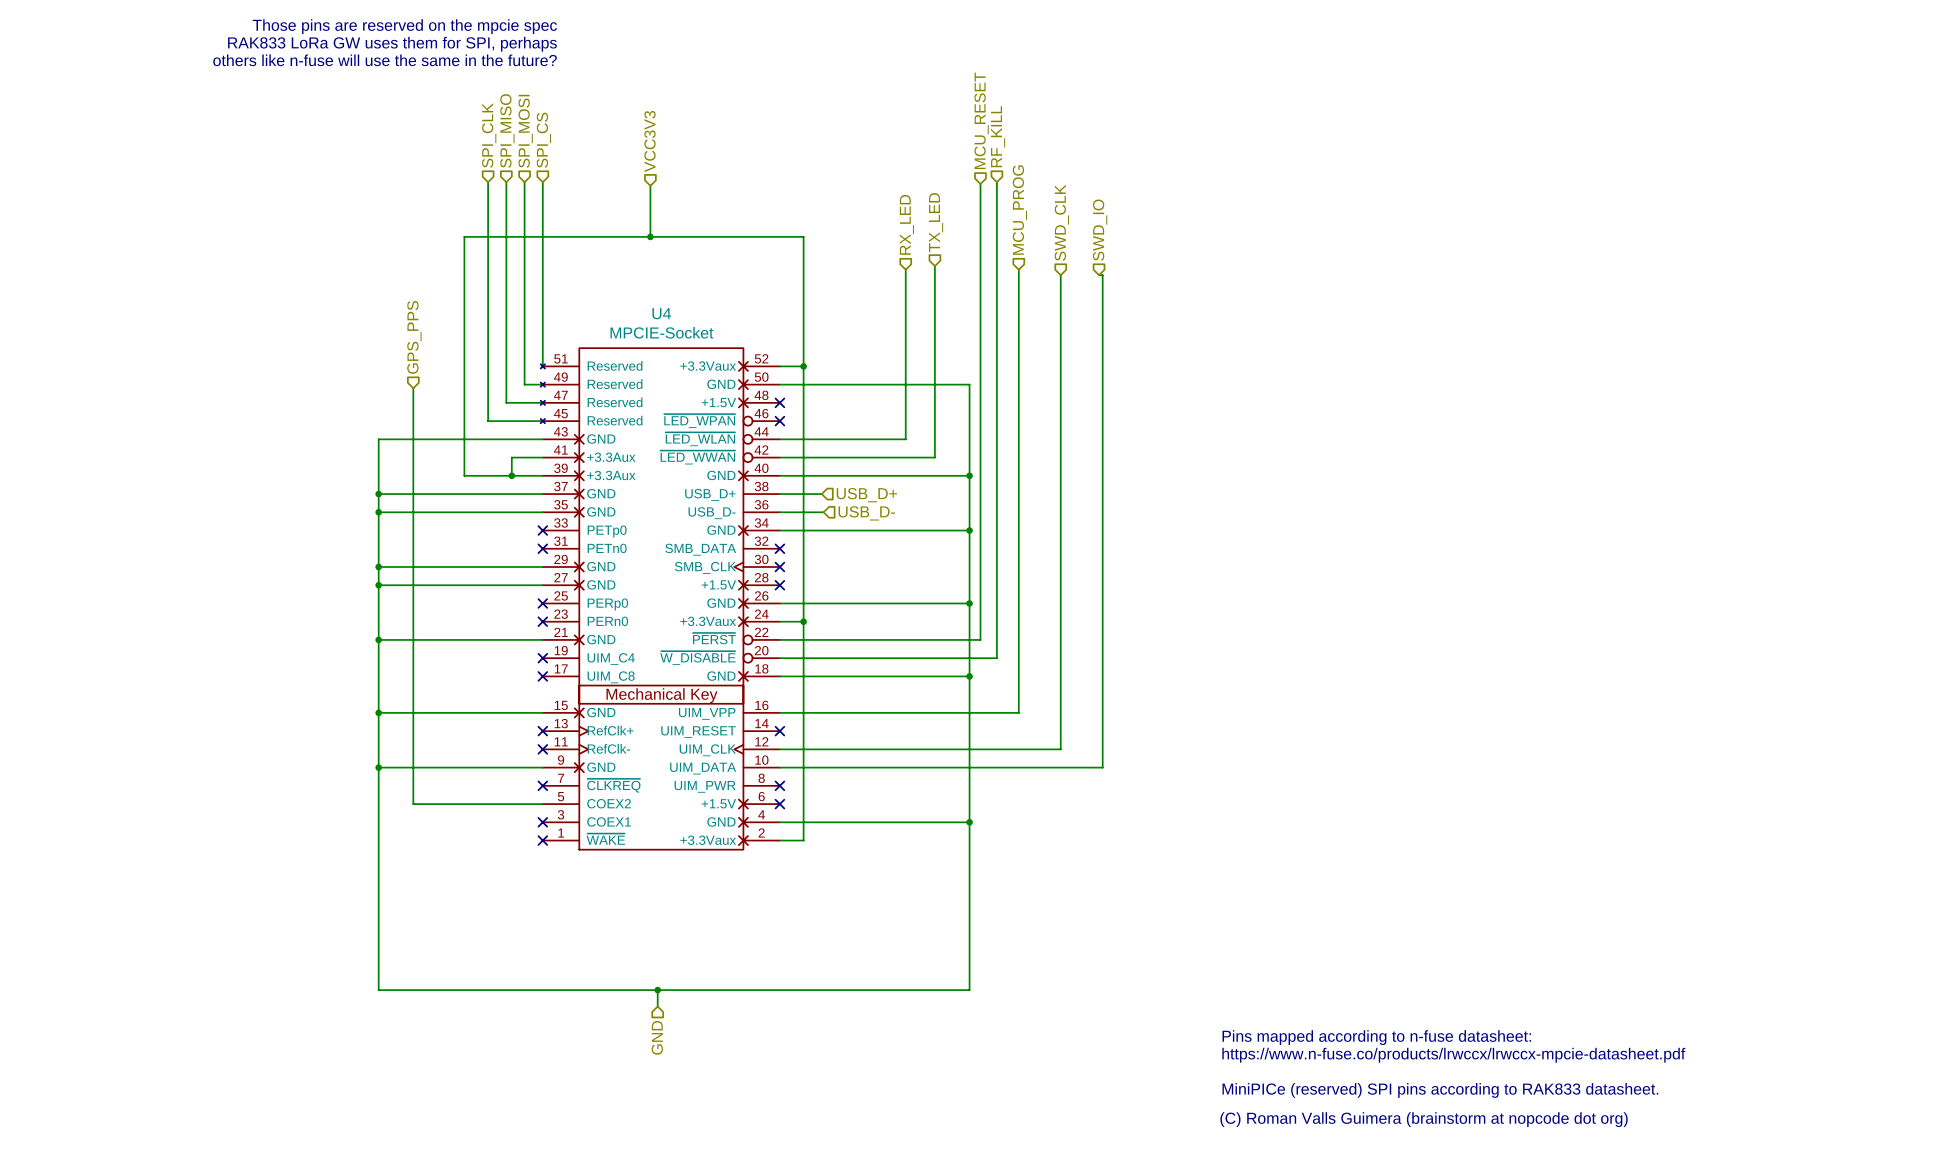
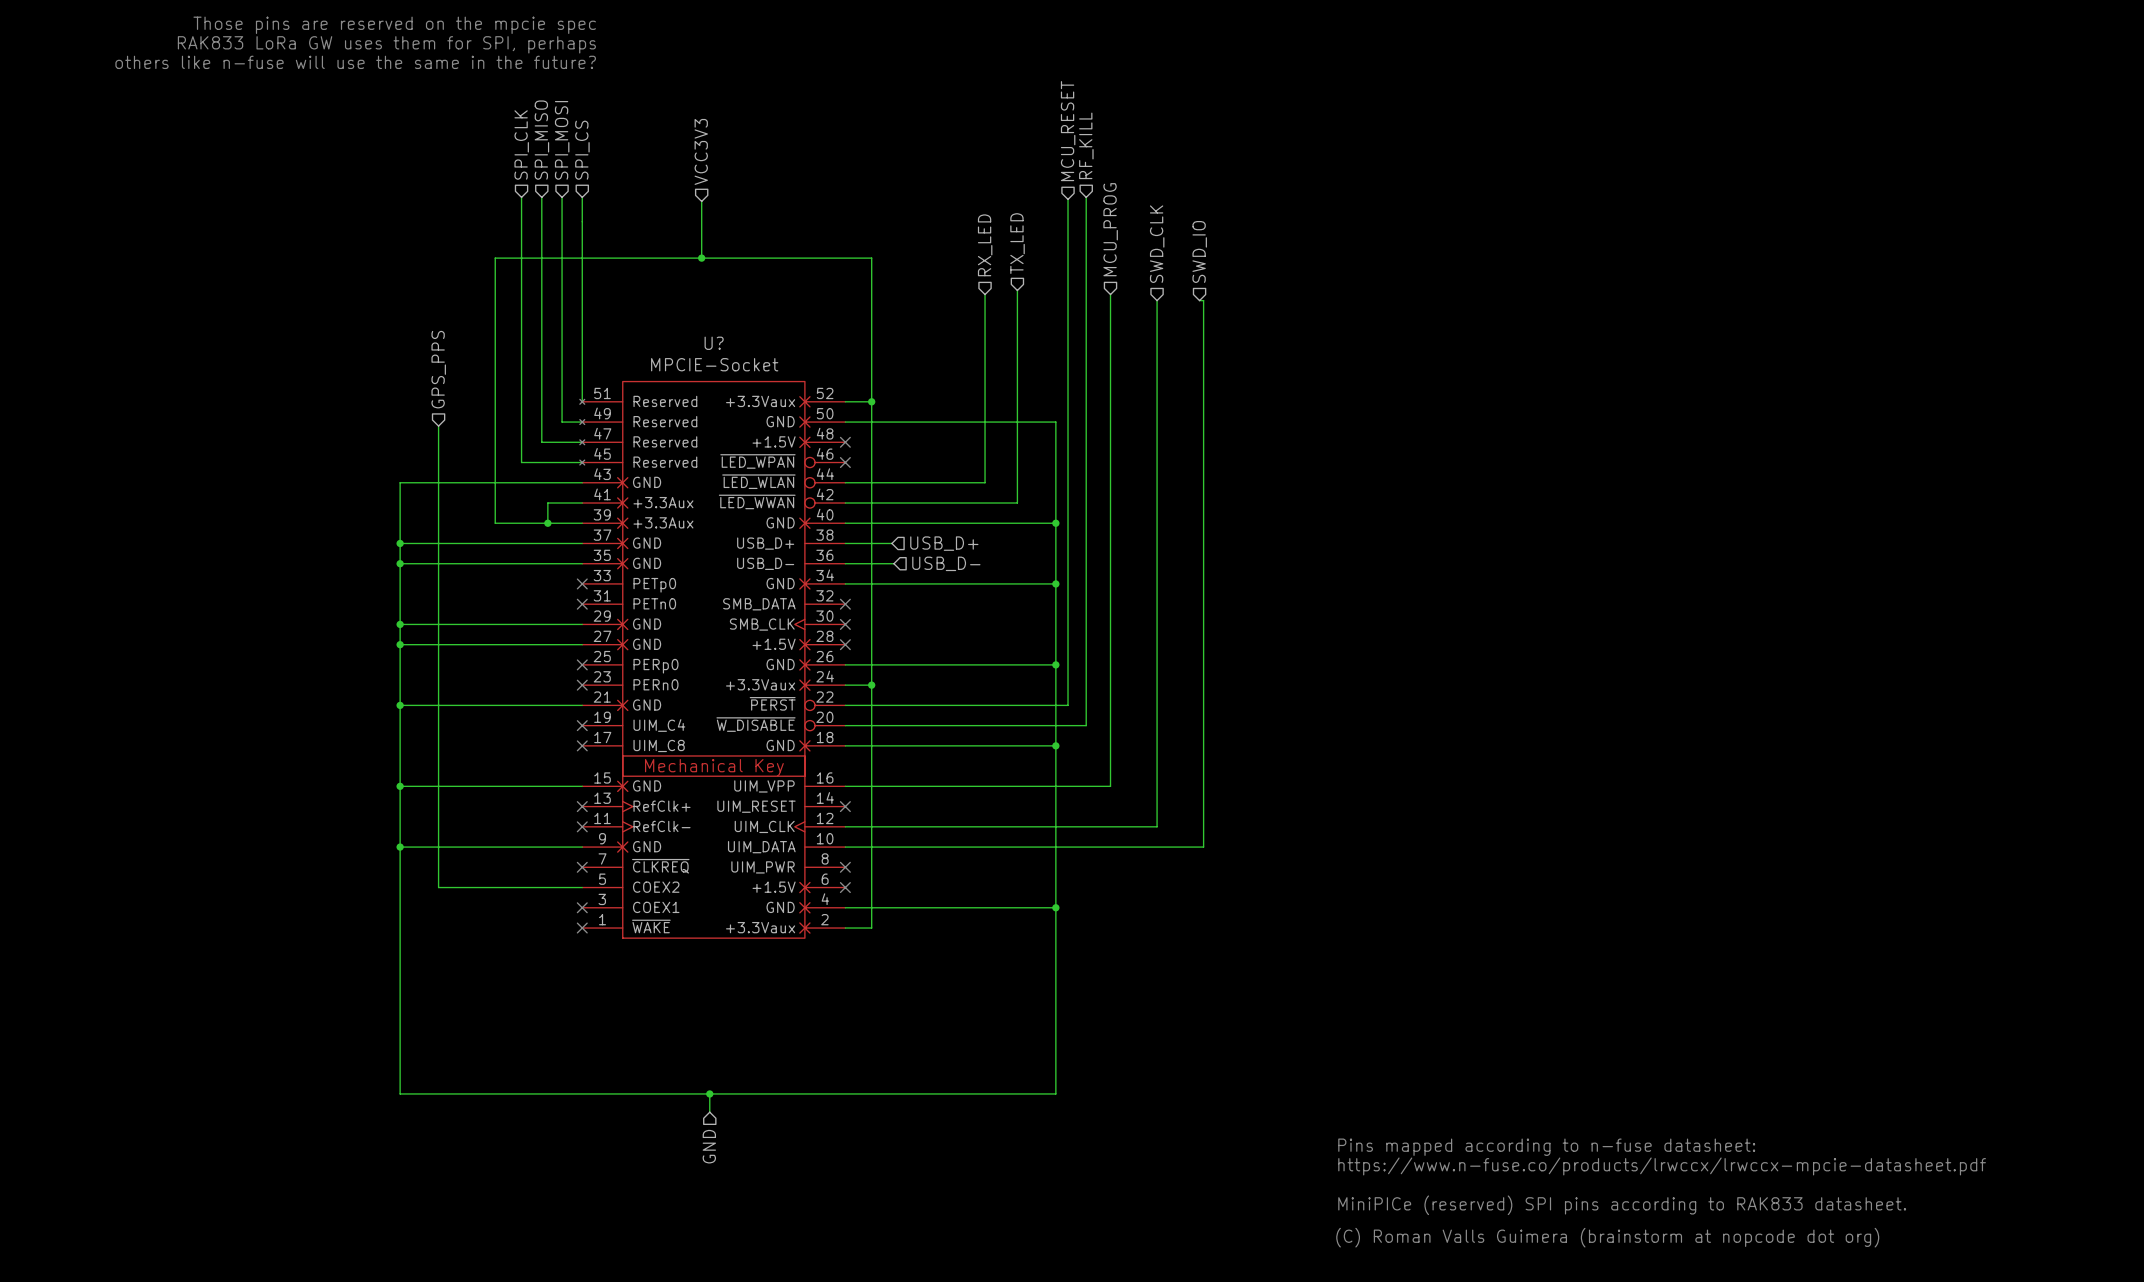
U4 name: U4 (661, 313) -> U? (714, 343)

